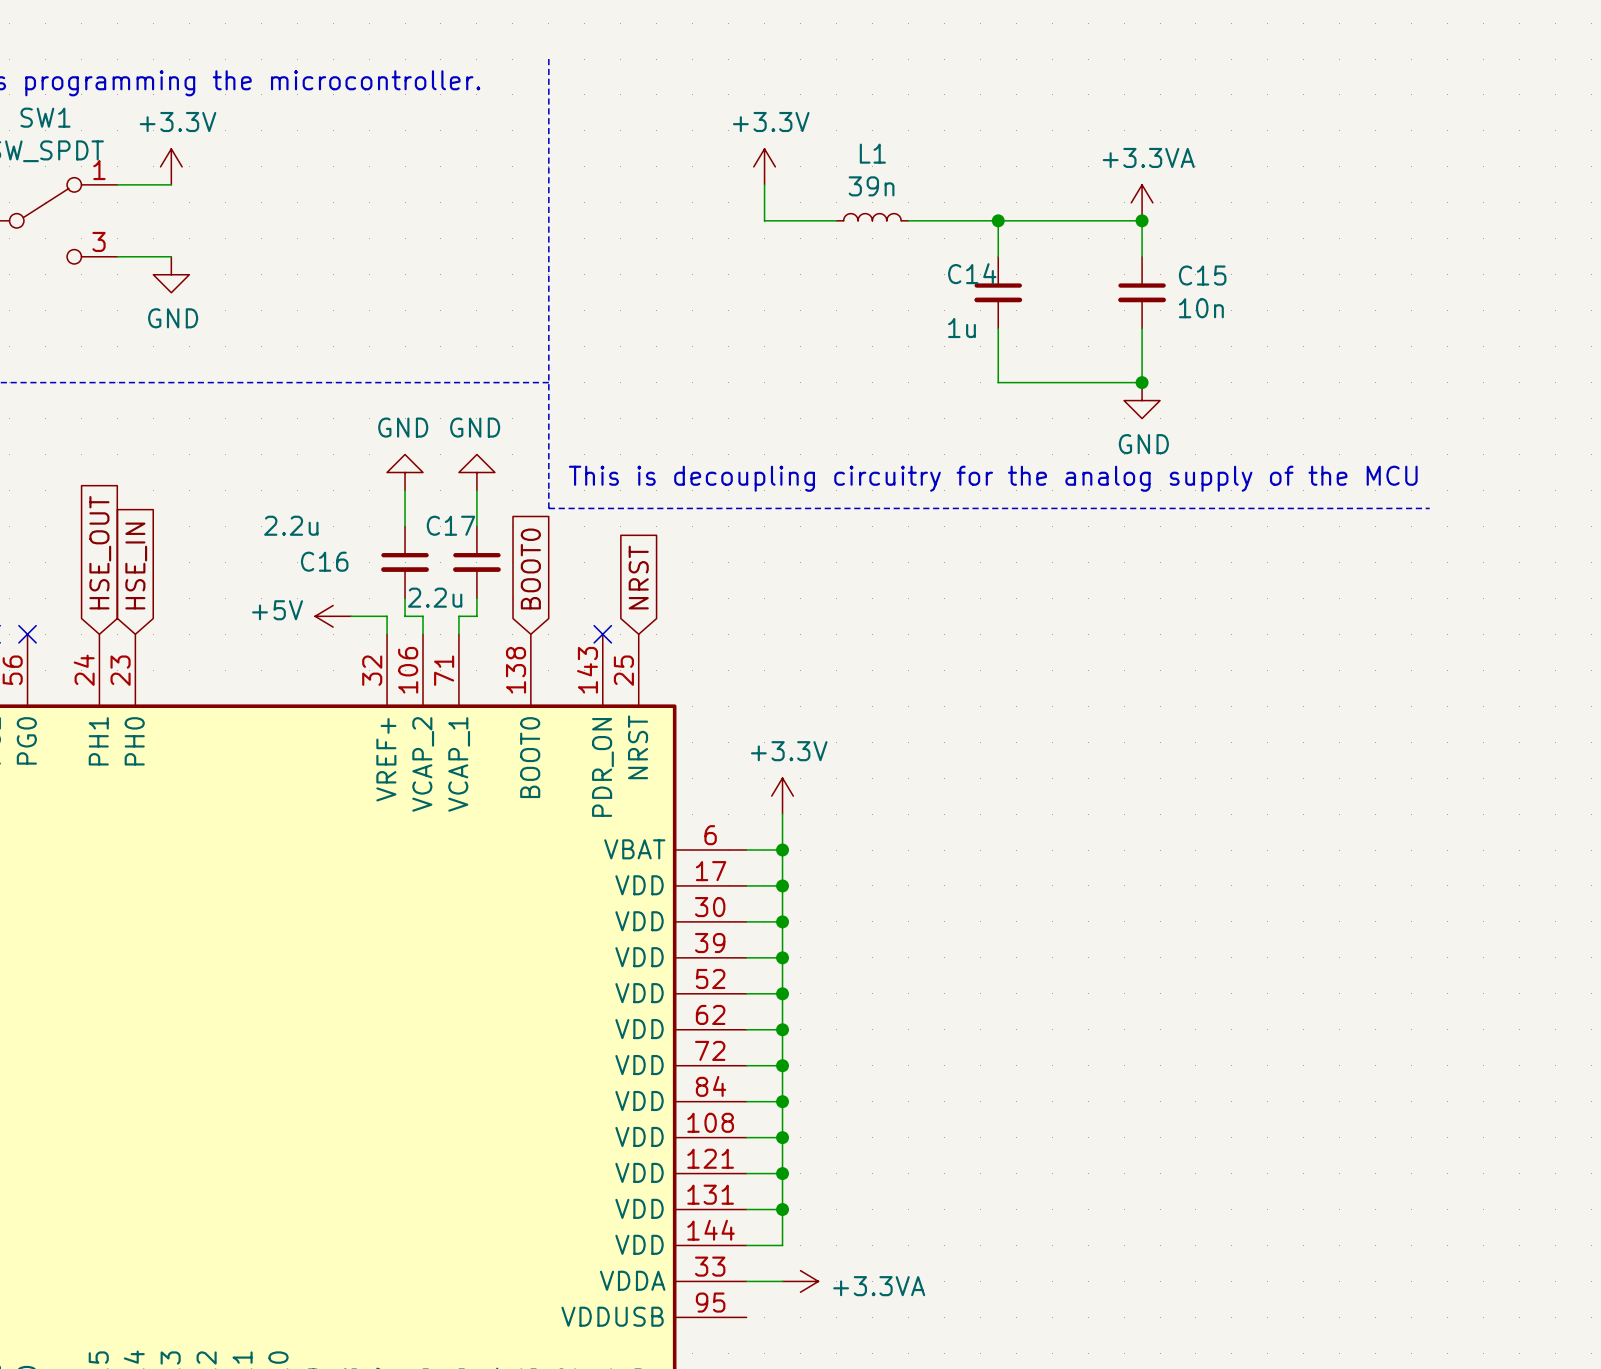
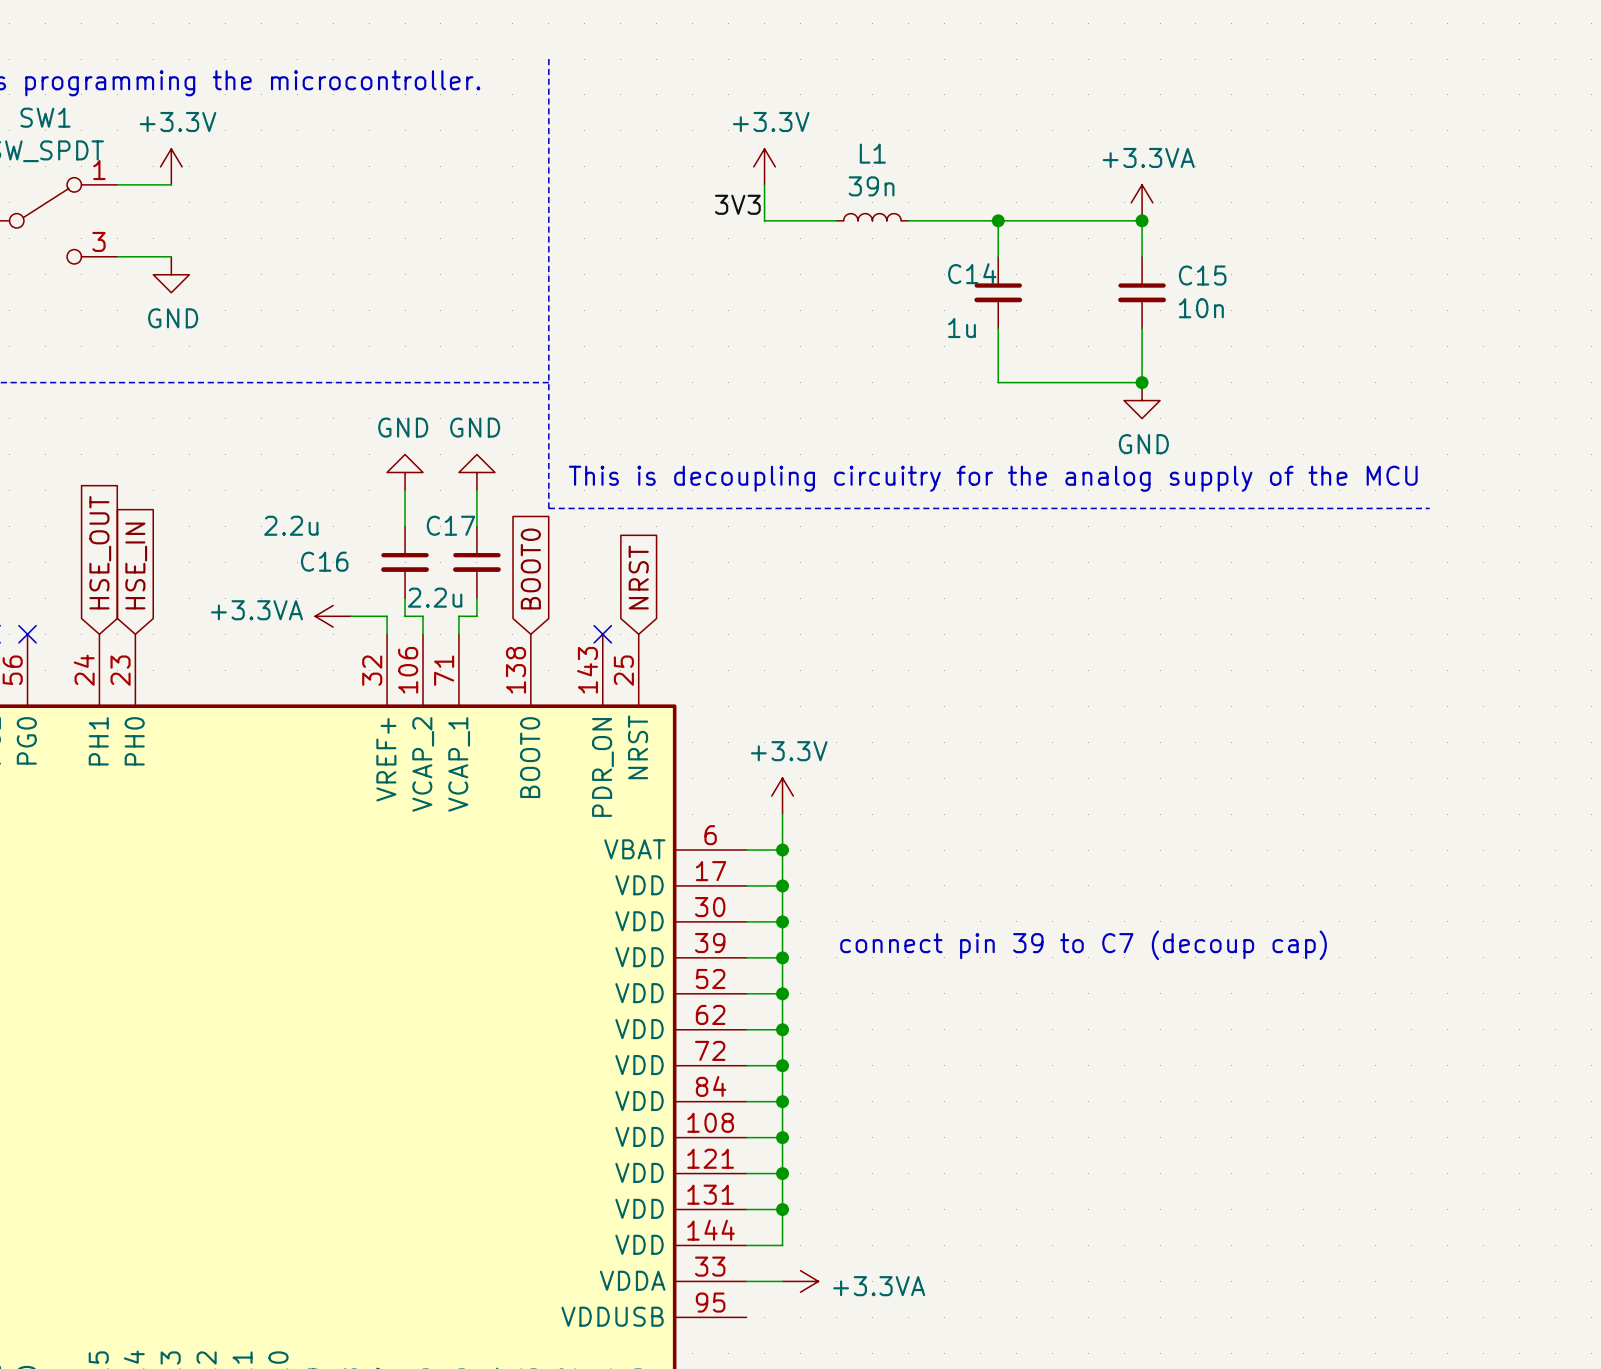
label: none -> 3V3 (737, 204)
power symbol: +5V (333, 616) -> +3.3VA (333, 616)
text: none -> connect pin 39 to C7 (decoup cap) (1083, 945)

